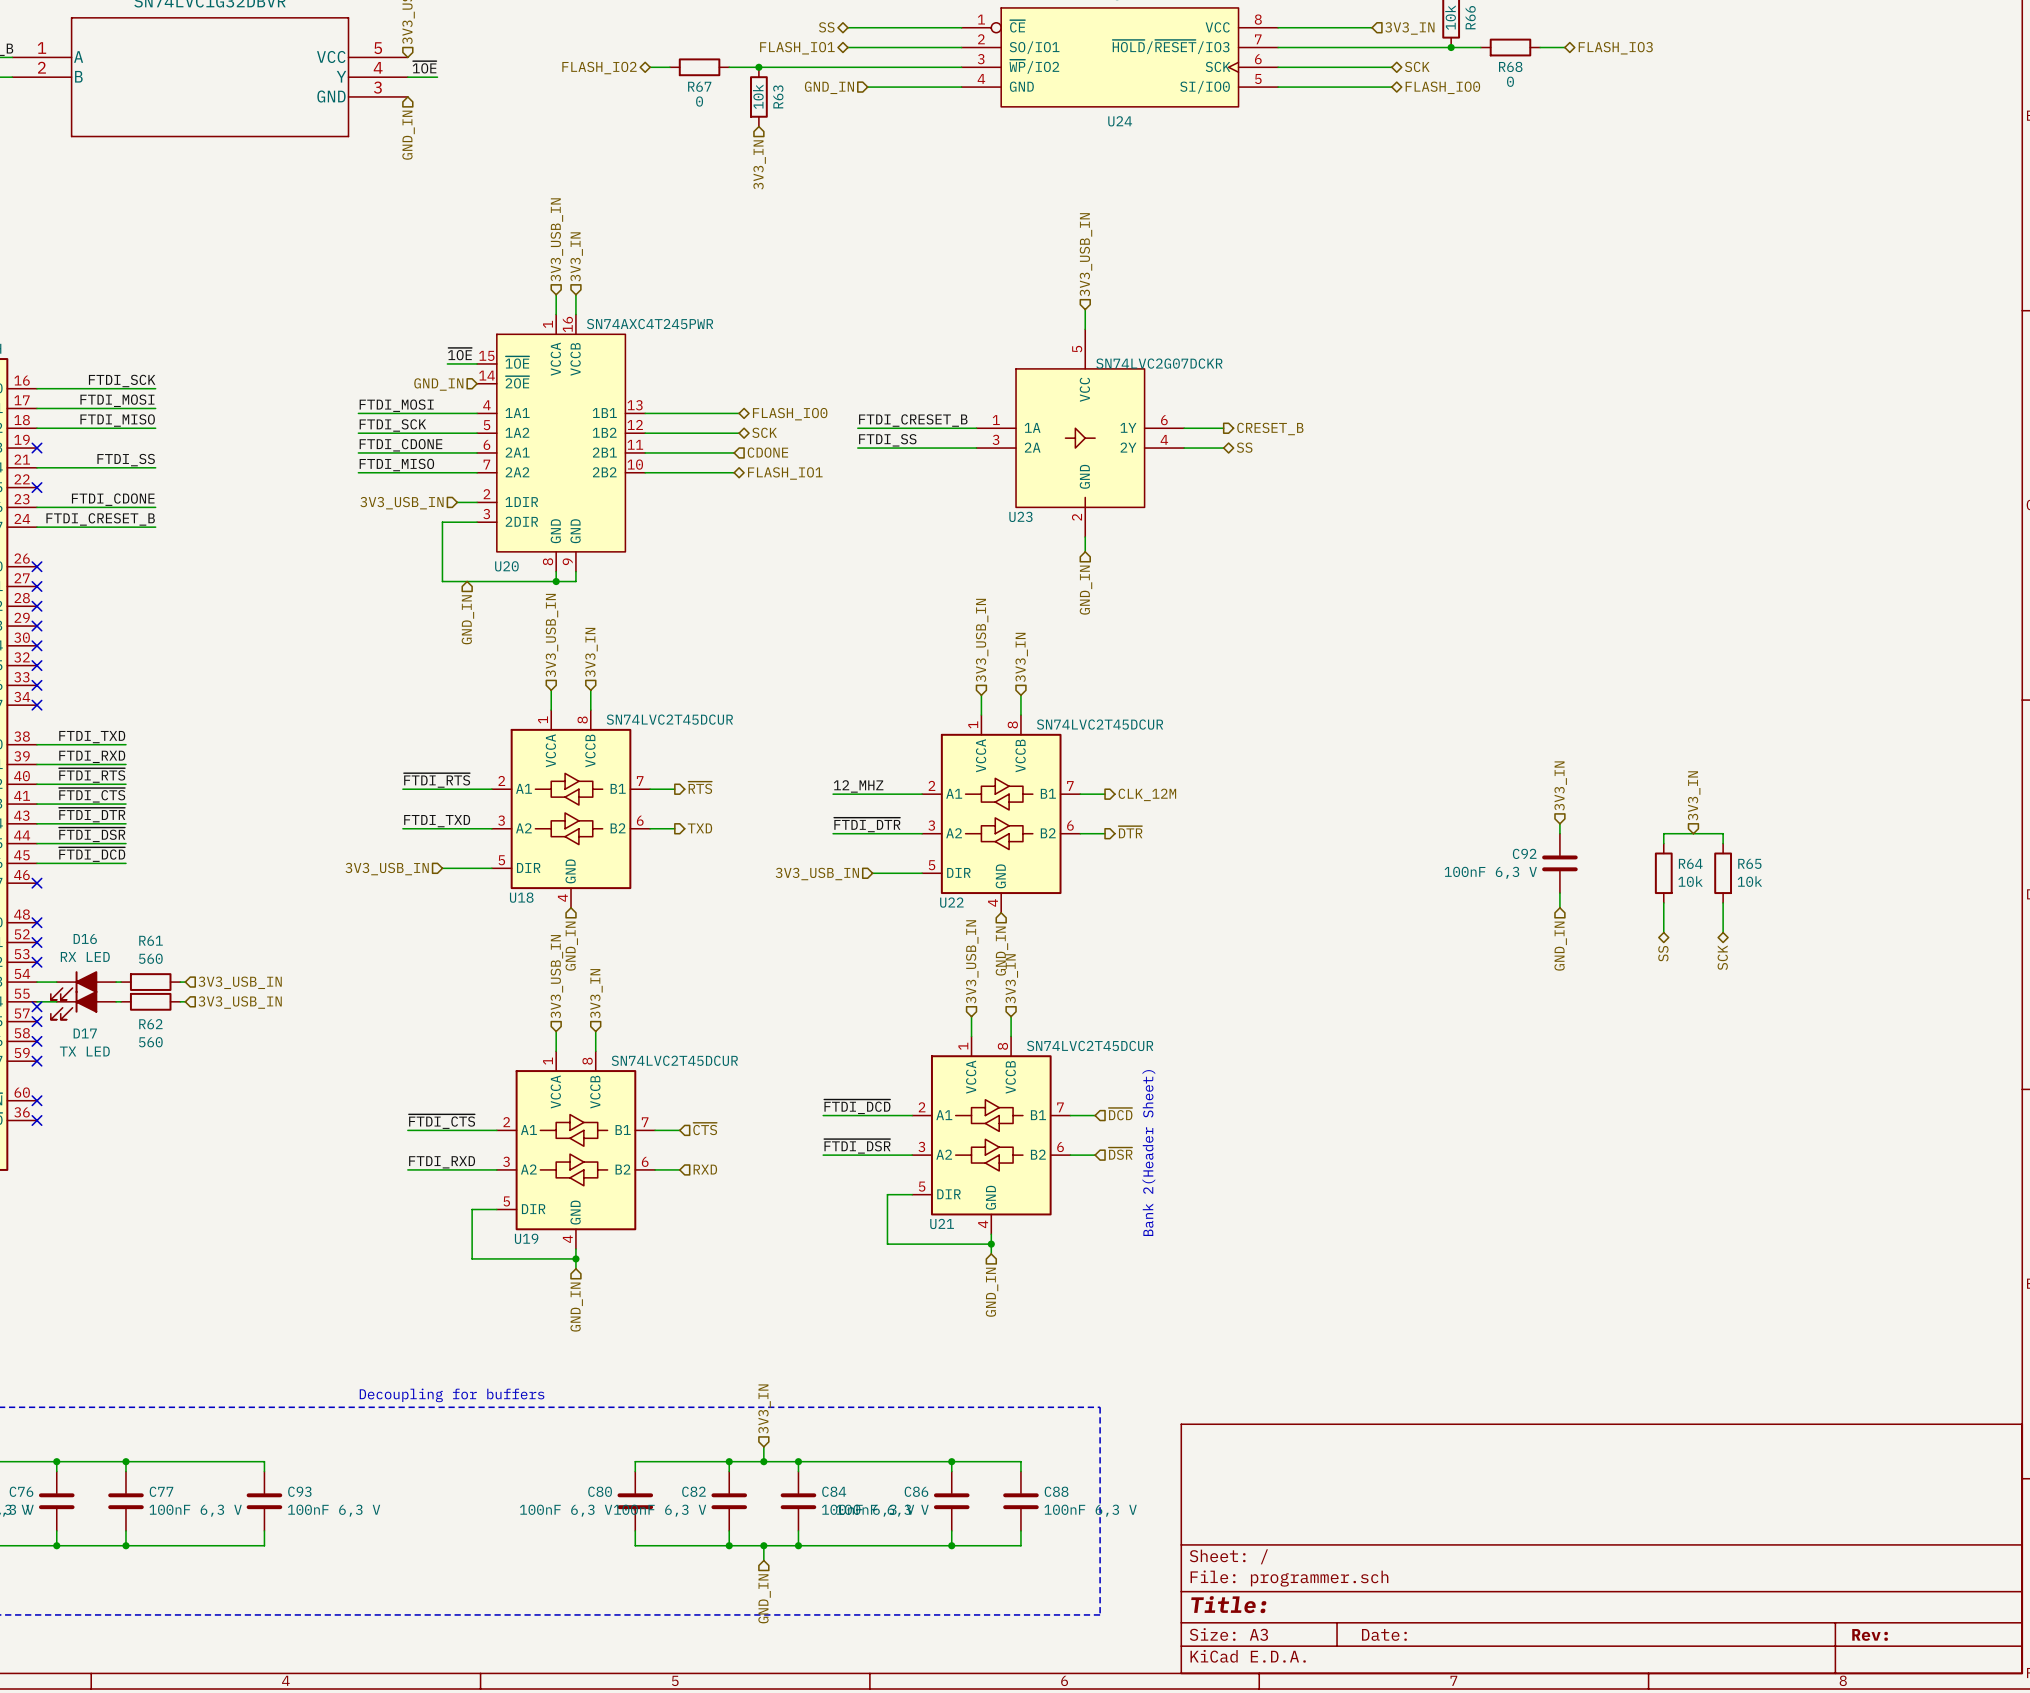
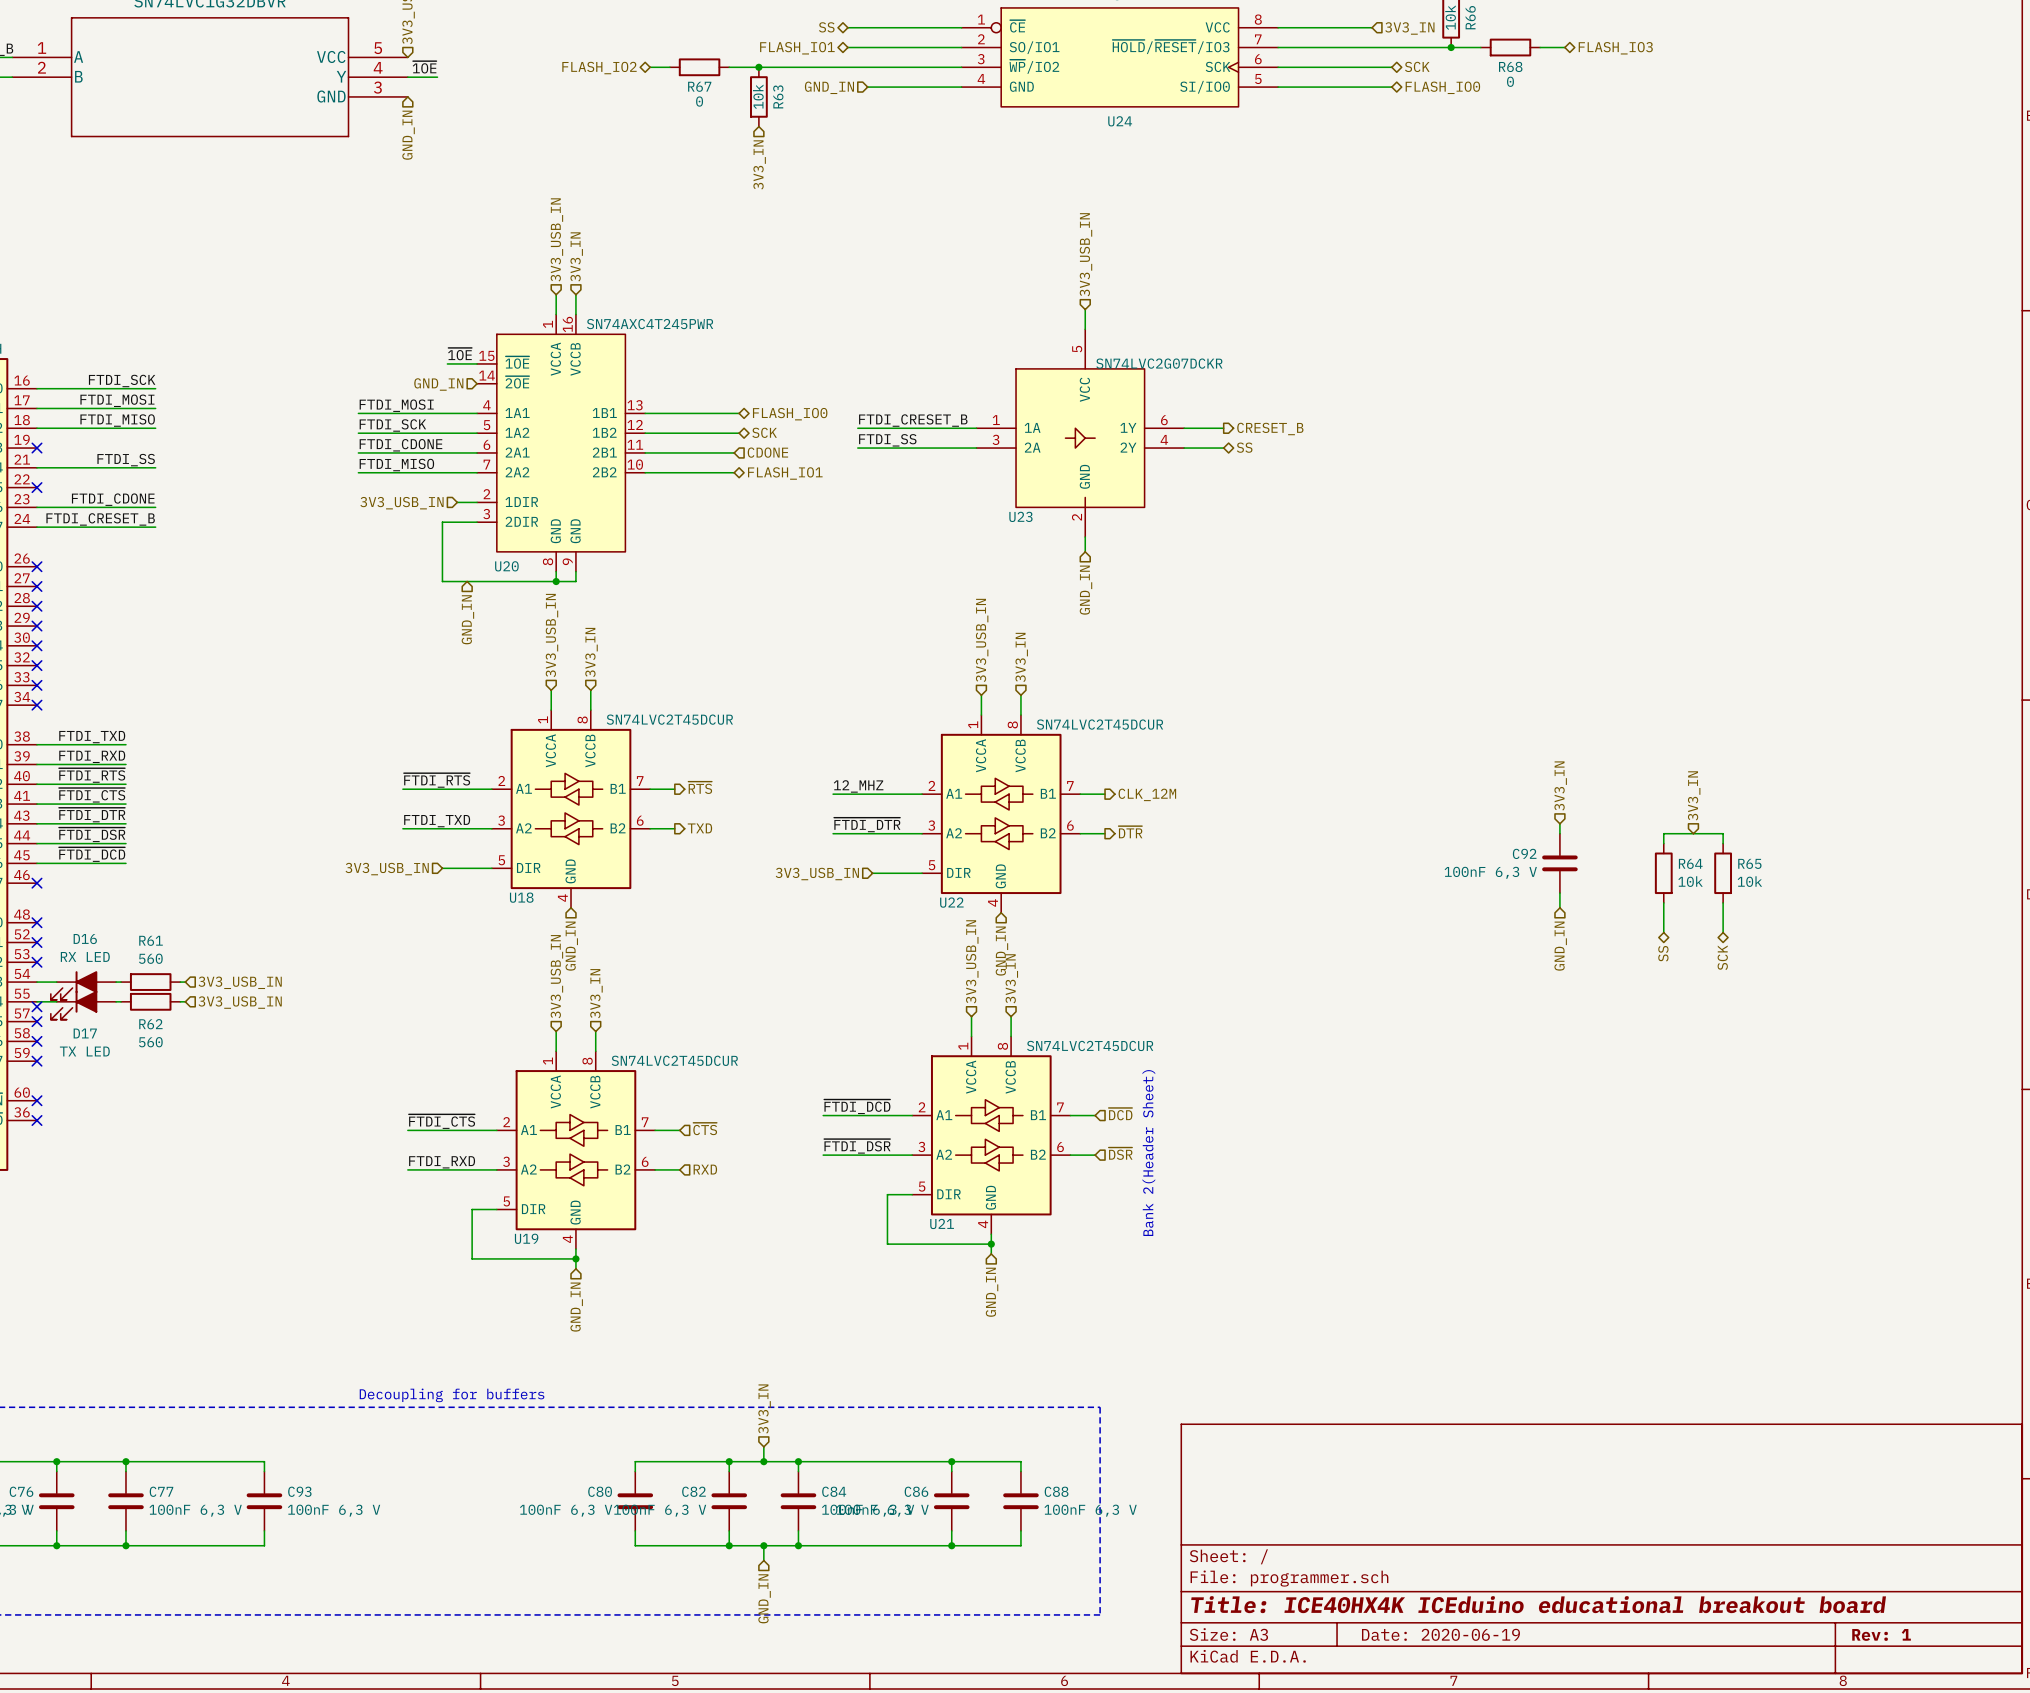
title block: Title: (1228, 1604) -> Title: ICE40HX4K ICEduino educational breakout board (1538, 1604)
title block: Date: (1384, 1634) -> Date: 2020-06-19 (1440, 1634)
title block: Rev: (1870, 1634) -> Rev: 1 (1881, 1634)

